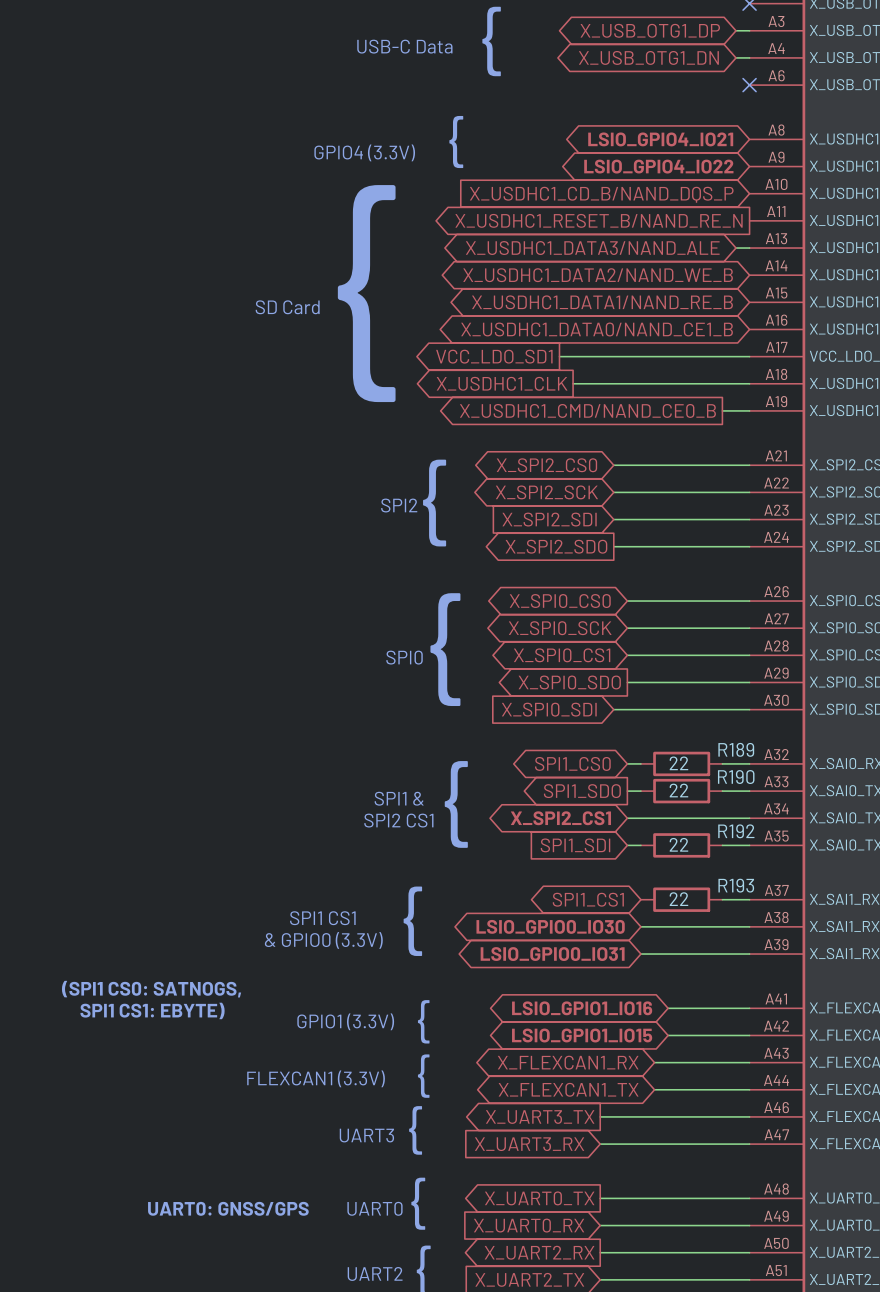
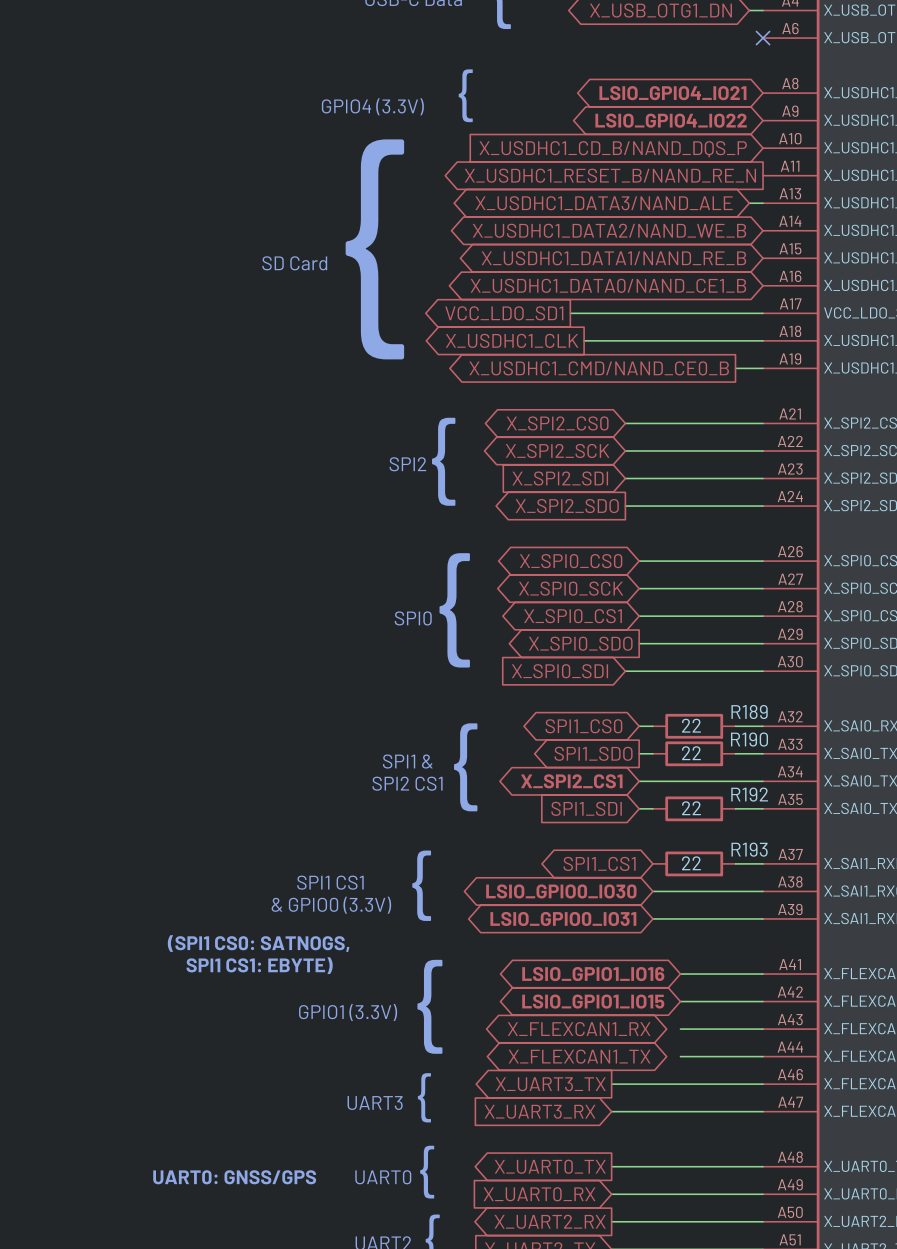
text position: (SPI1 CS0: SATNOGS, (151, 989) -> (SPI1 CS0: SATNOGS, (258, 943)
text position: SPI1 CS1: EBYTE) (152, 1010) -> SPI1 CS1: EBYTE) (259, 965)
text position: GPIO1 (3.3V) (345, 1021) -> GPIO1 (3.3V) (348, 1012)
text: { (423, 1021) -> none
text: none -> { (429, 1006)
wire: (654, 1062) (668, 1062) -> none
text: { (423, 1076) -> none
text: FLEXCAN1 (3.3V) (316, 1078) -> none
wire: (654, 1089) (668, 1089) -> none

